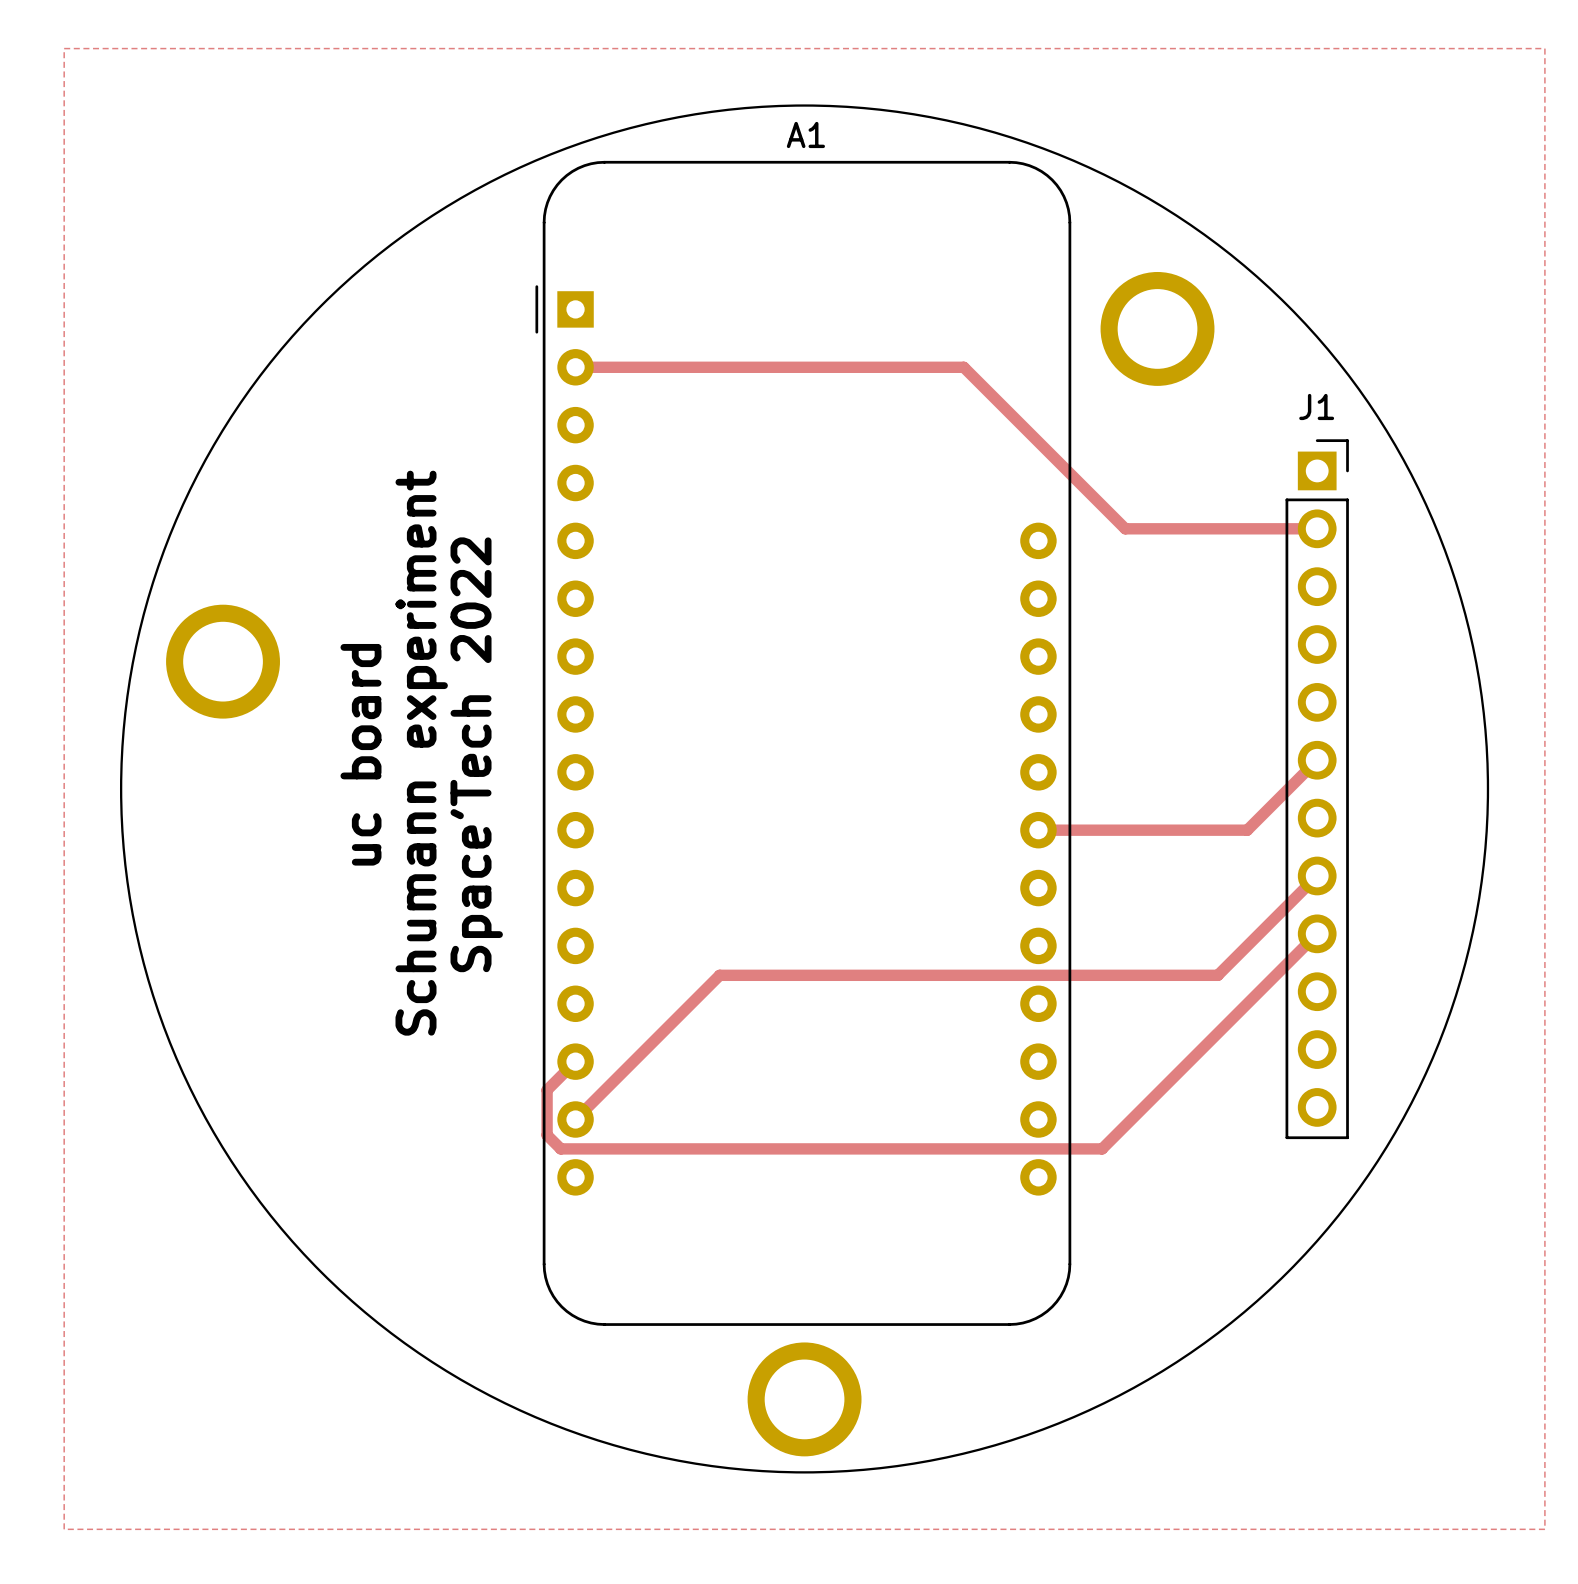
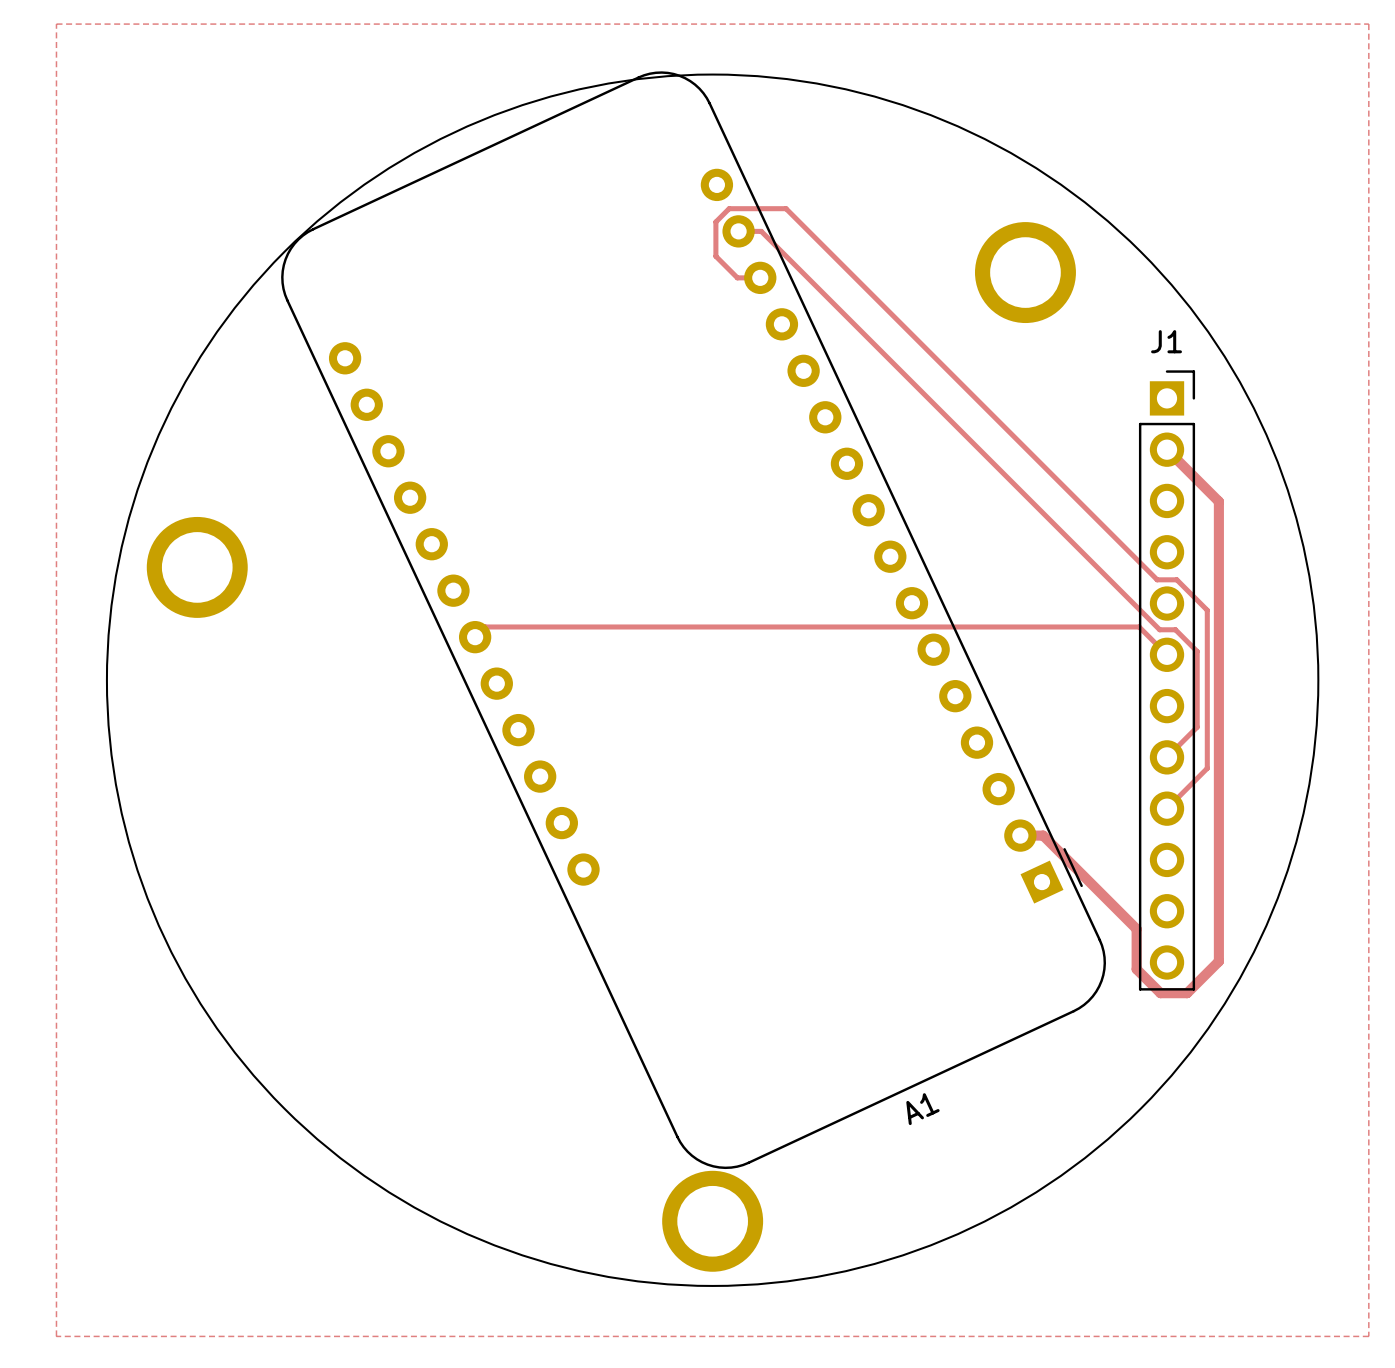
track: (575, 367) (963, 367) (1125, 528) (1317, 528) -> (1020, 835) (1043, 835) (1136, 929) (1136, 969) (1160, 993) (1187, 993) (1218, 961) (1218, 501) (1167, 449)
A1 rotation: 0° (803, 743) -> 155° clockwise (693, 620)
text: Schumann experiment (421, 753) -> none
text: uc board (360, 754) -> none
text: Space'Tech 2022 (476, 754) -> none
track: (1317, 760) (1247, 830) (1038, 830) -> (1167, 654) (1139, 626) (485, 626) (475, 637)
track: (1317, 875) (1217, 975) (719, 975) (575, 1119) -> (1167, 757) (1197, 727) (1197, 651) (1175, 629) (1159, 629) (761, 231) (738, 231)
track: (1317, 933) (1102, 1148) (560, 1148) (547, 1135) (547, 1090) (575, 1061) -> (1167, 808) (1207, 768) (1207, 610) (1176, 579) (1157, 579) (786, 208) (729, 208) (715, 221) (715, 256) (737, 277) (760, 277)

